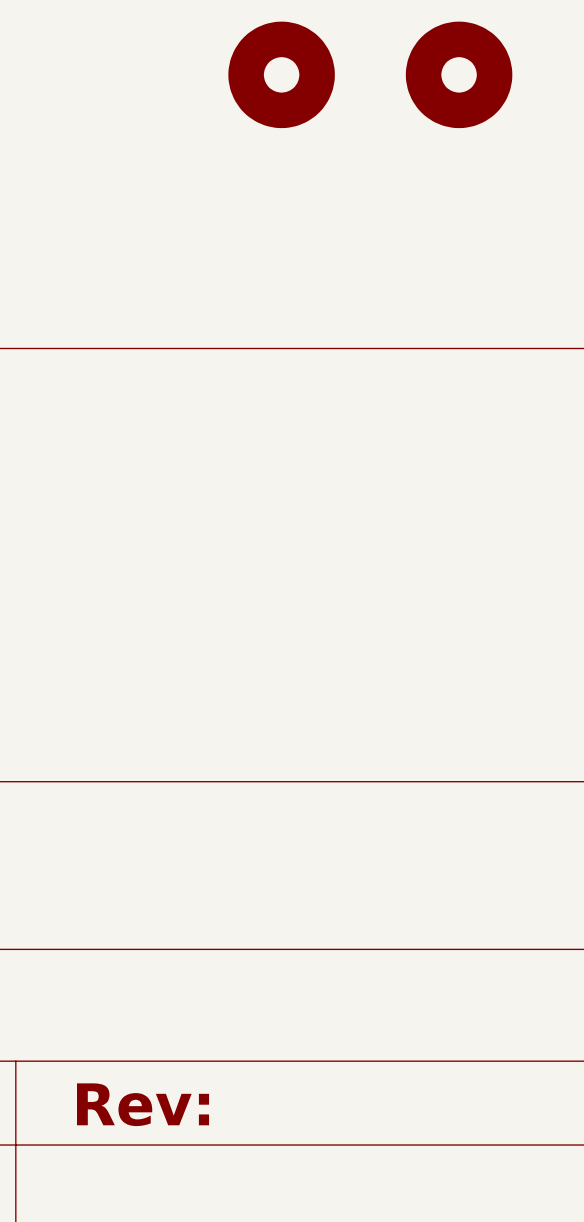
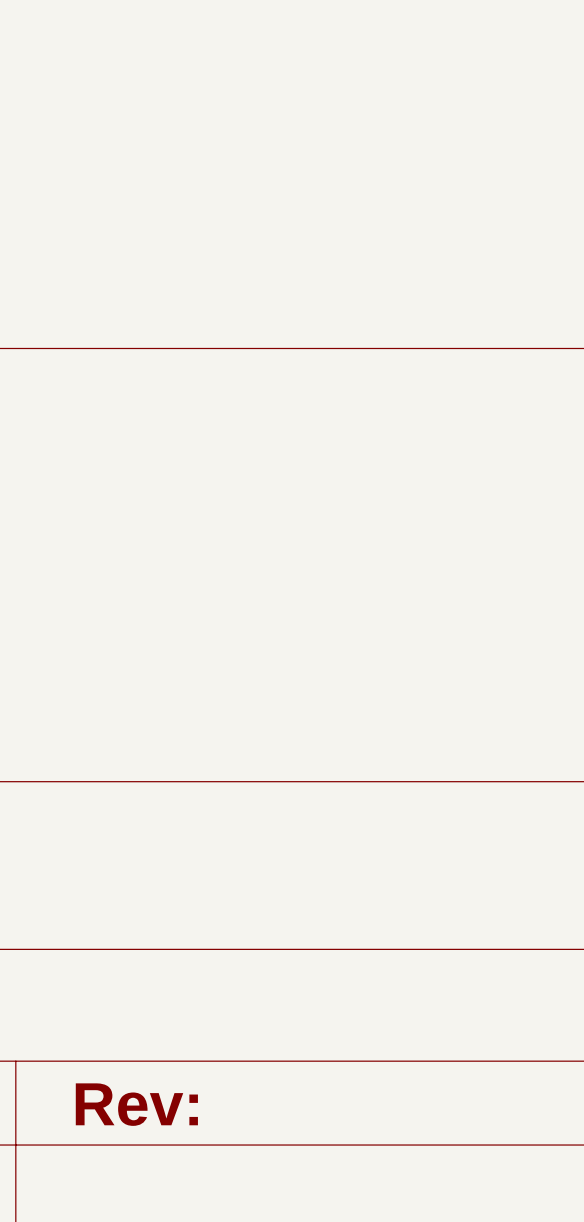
part: (281, 74) -> none
part: (459, 74) -> none

